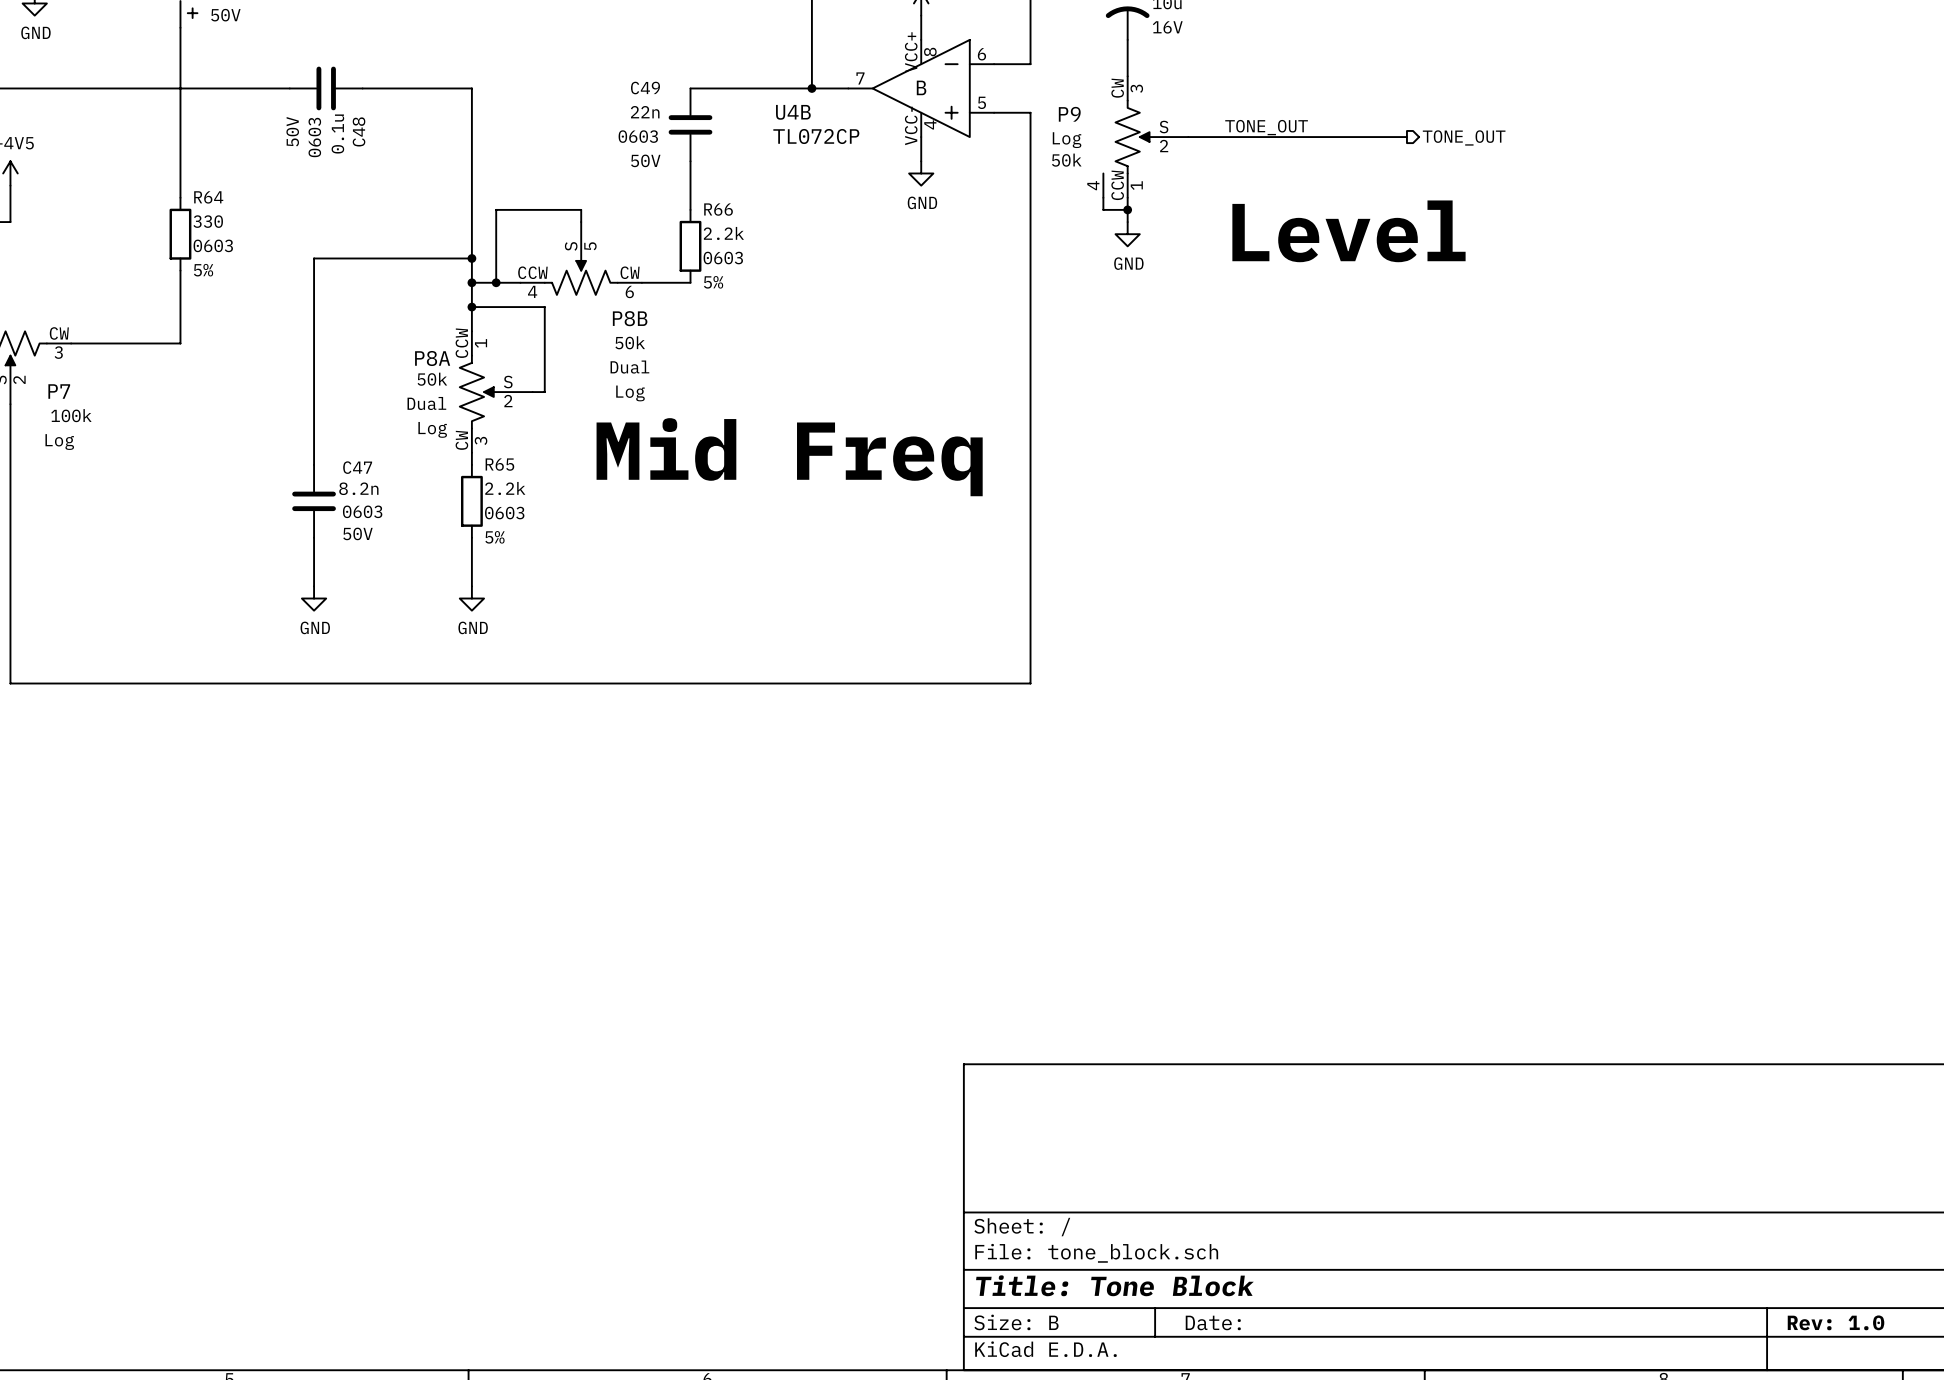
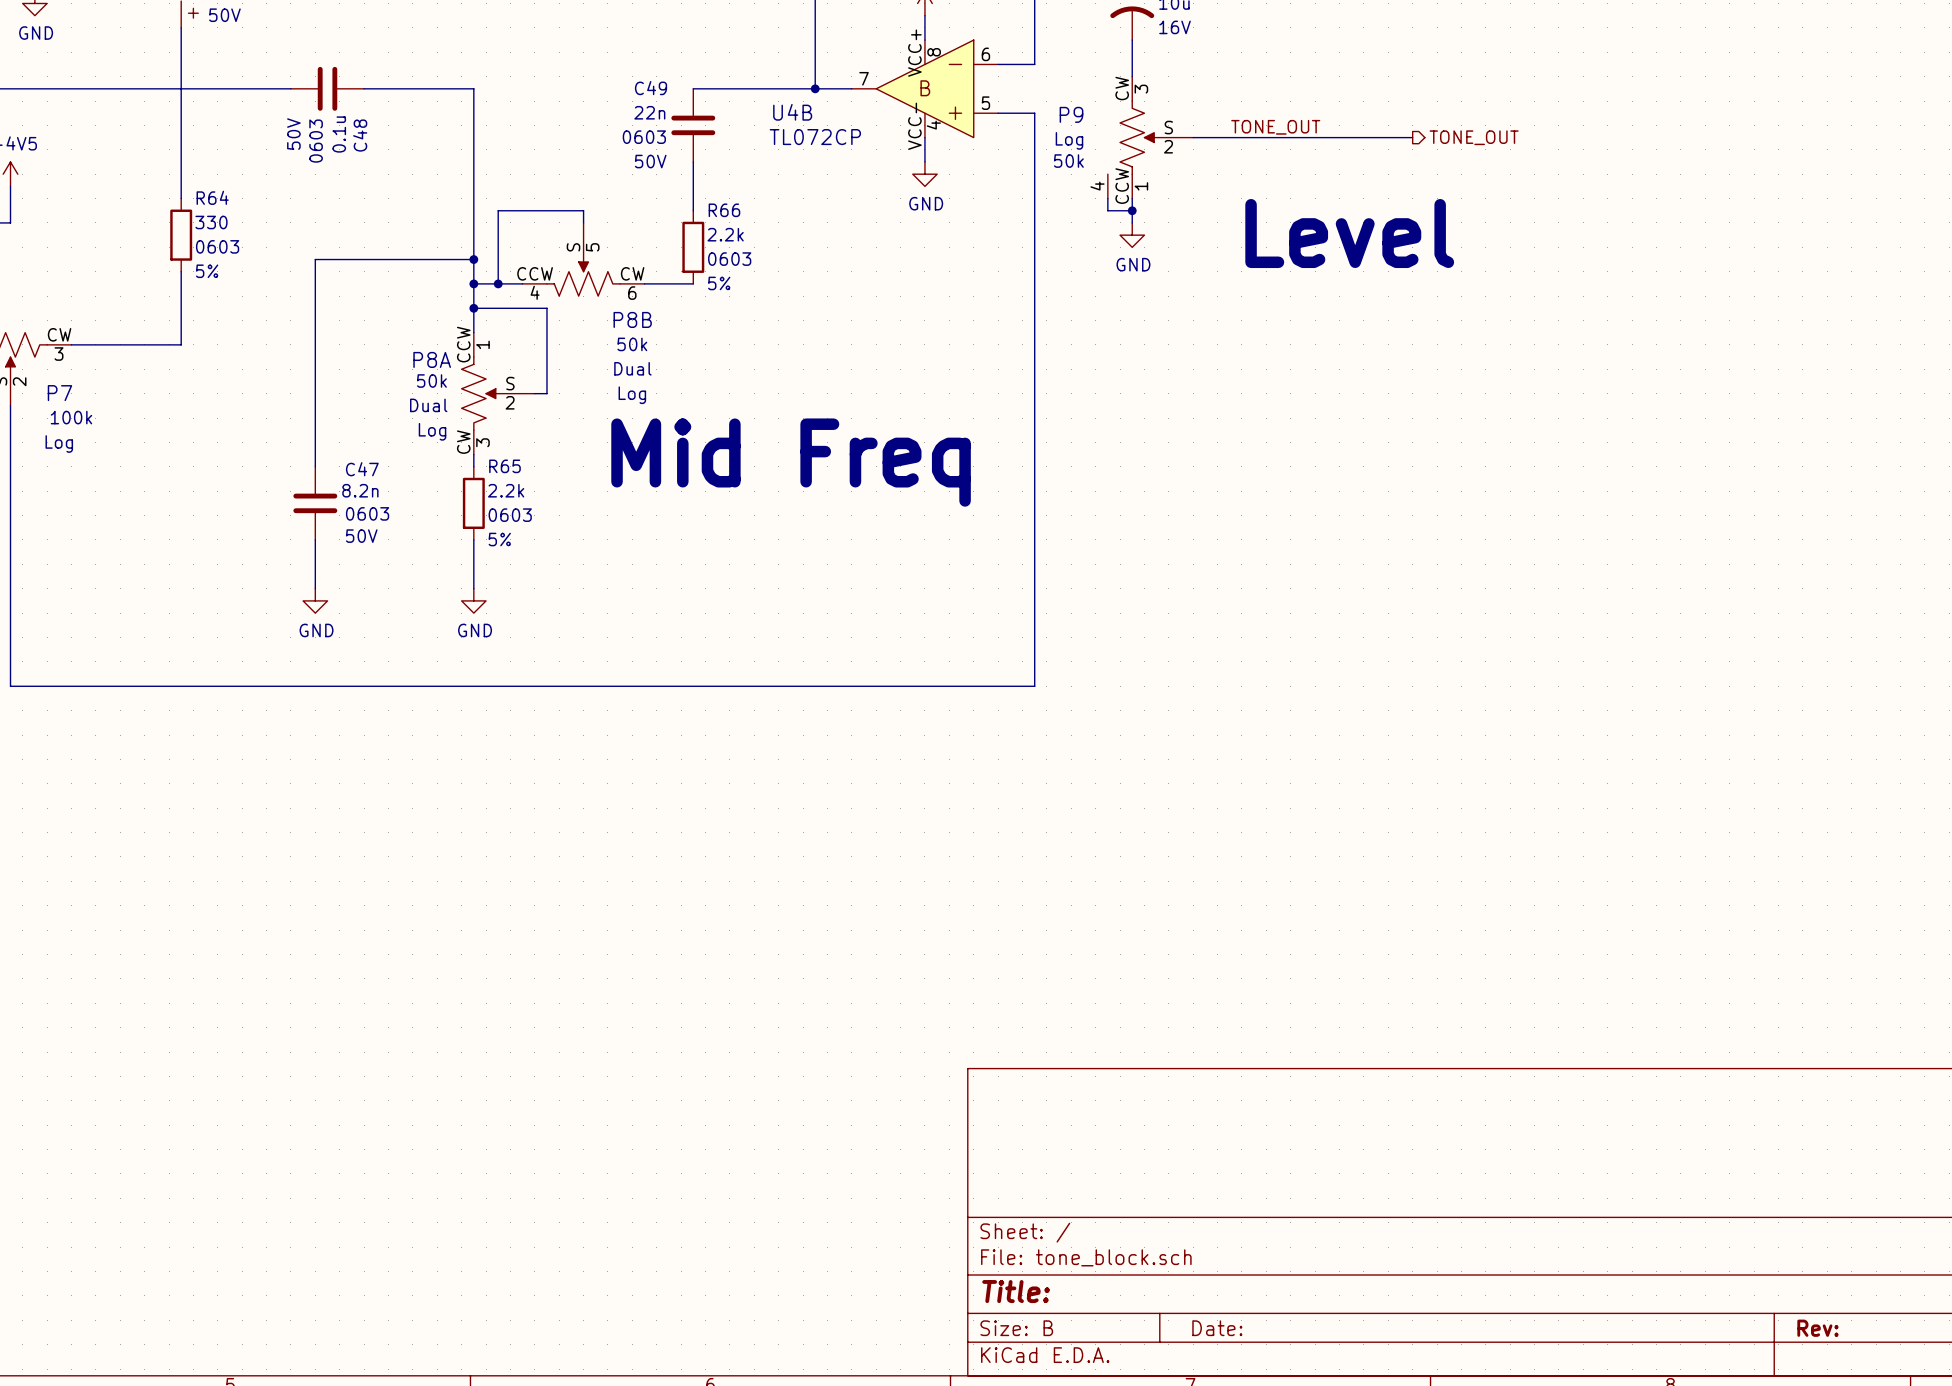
title block: Title: Tone Block (1114, 1285) -> Title: (1016, 1291)
title block: Rev: 1.0 (1836, 1322) -> Rev: (1817, 1328)

